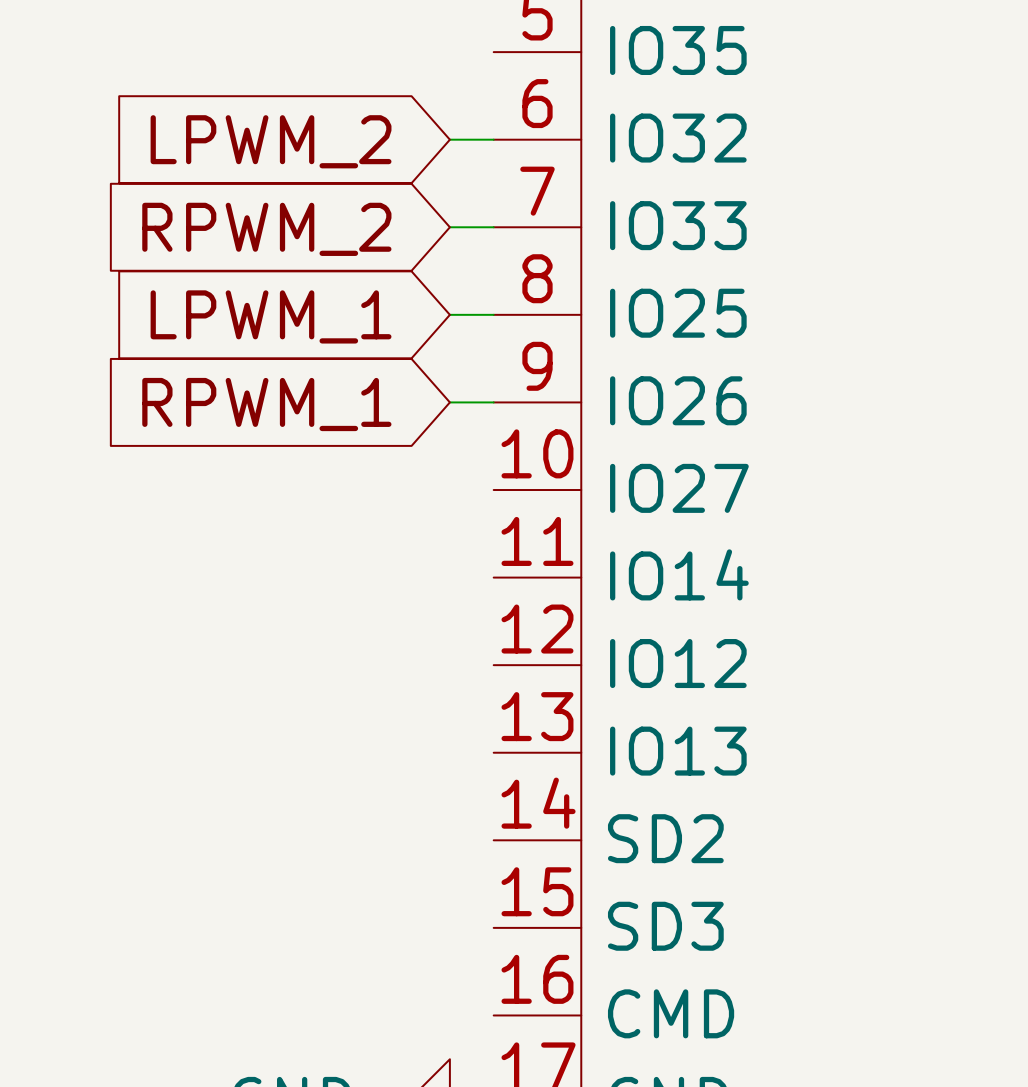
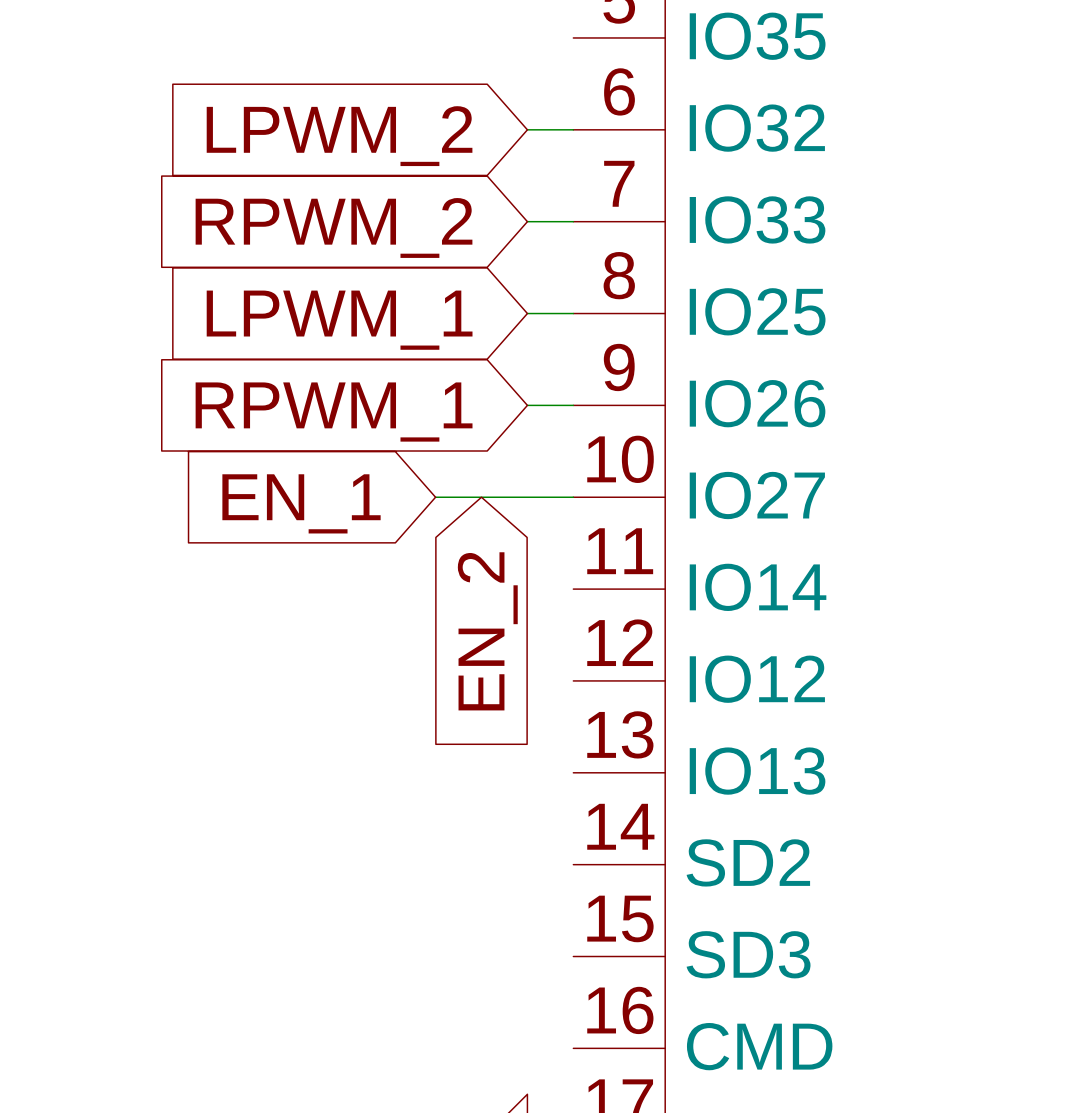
wire: none -> (435, 497) (573, 497)
global label: none -> EN_1 (301, 503)
global label: none -> EN_2 (487, 631)

